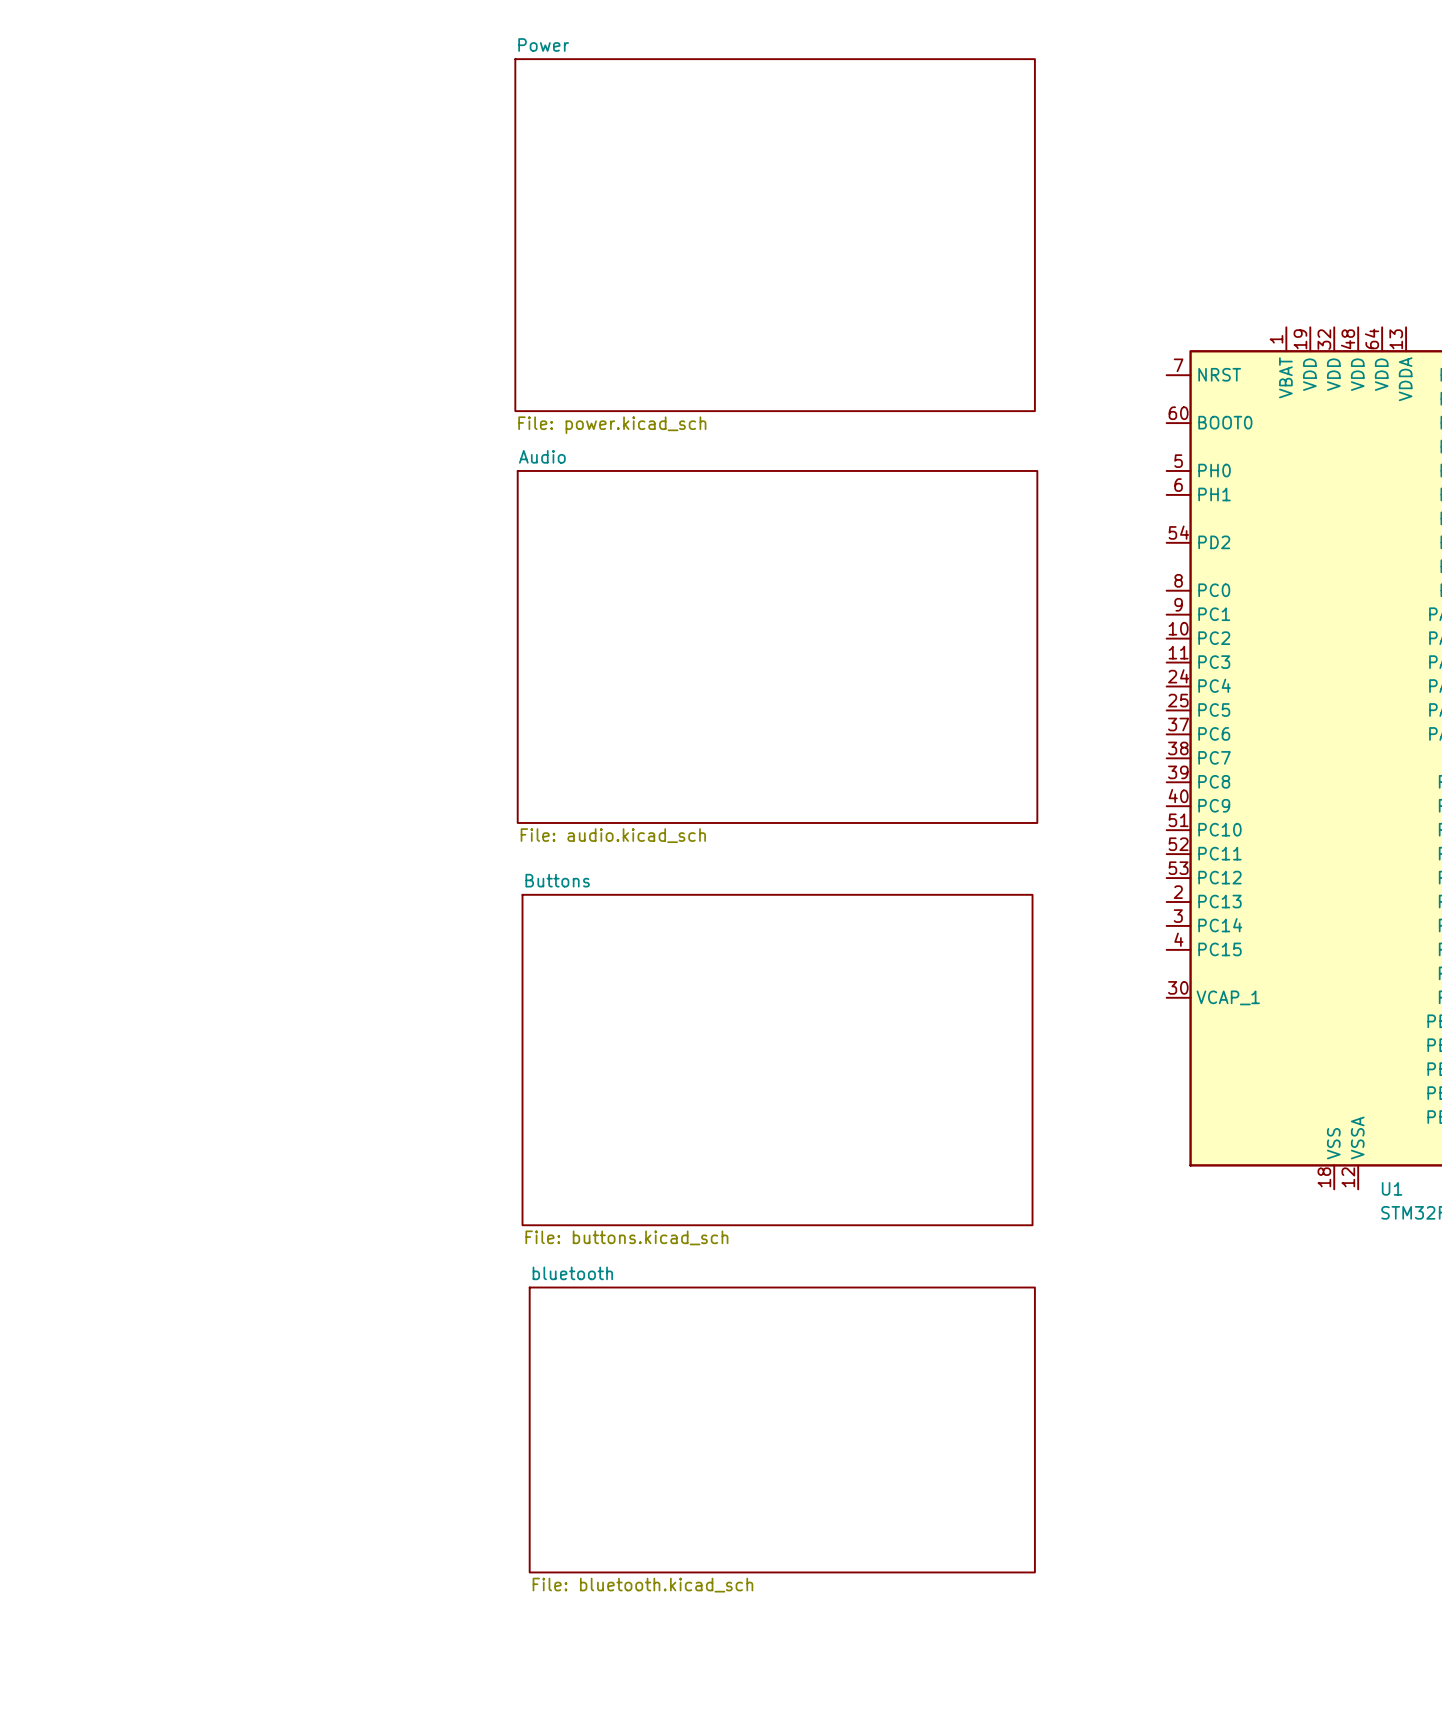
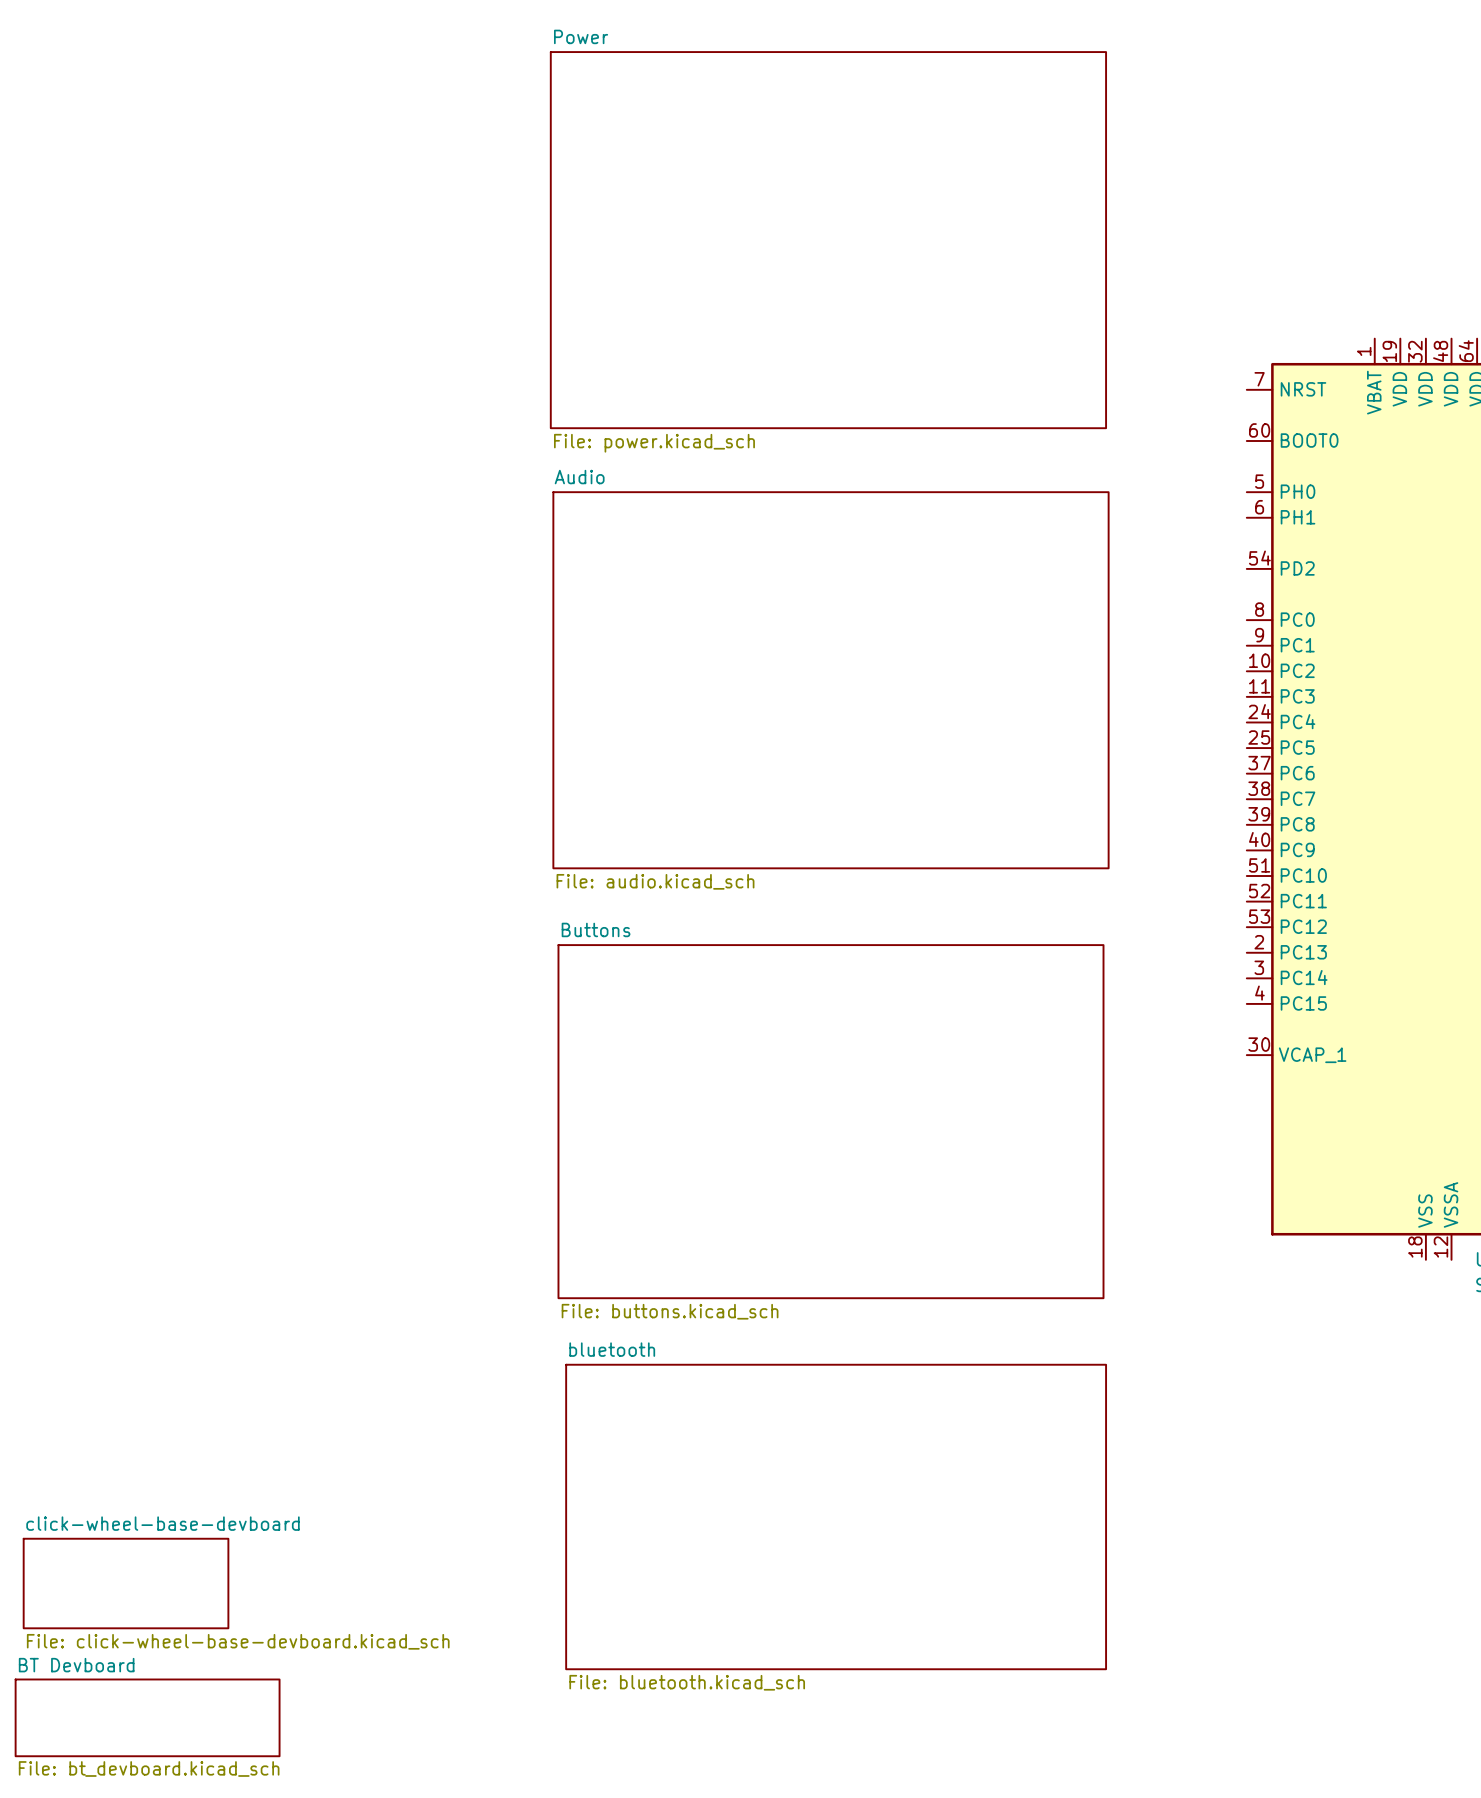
sheet click-wheel-base-devboard: none -> File: click-wheel-base-devboard.kicad_sch (126, 1583)
sheet BT Devboard: none -> File: bt_devboard.kicad_sch (147, 1717)

